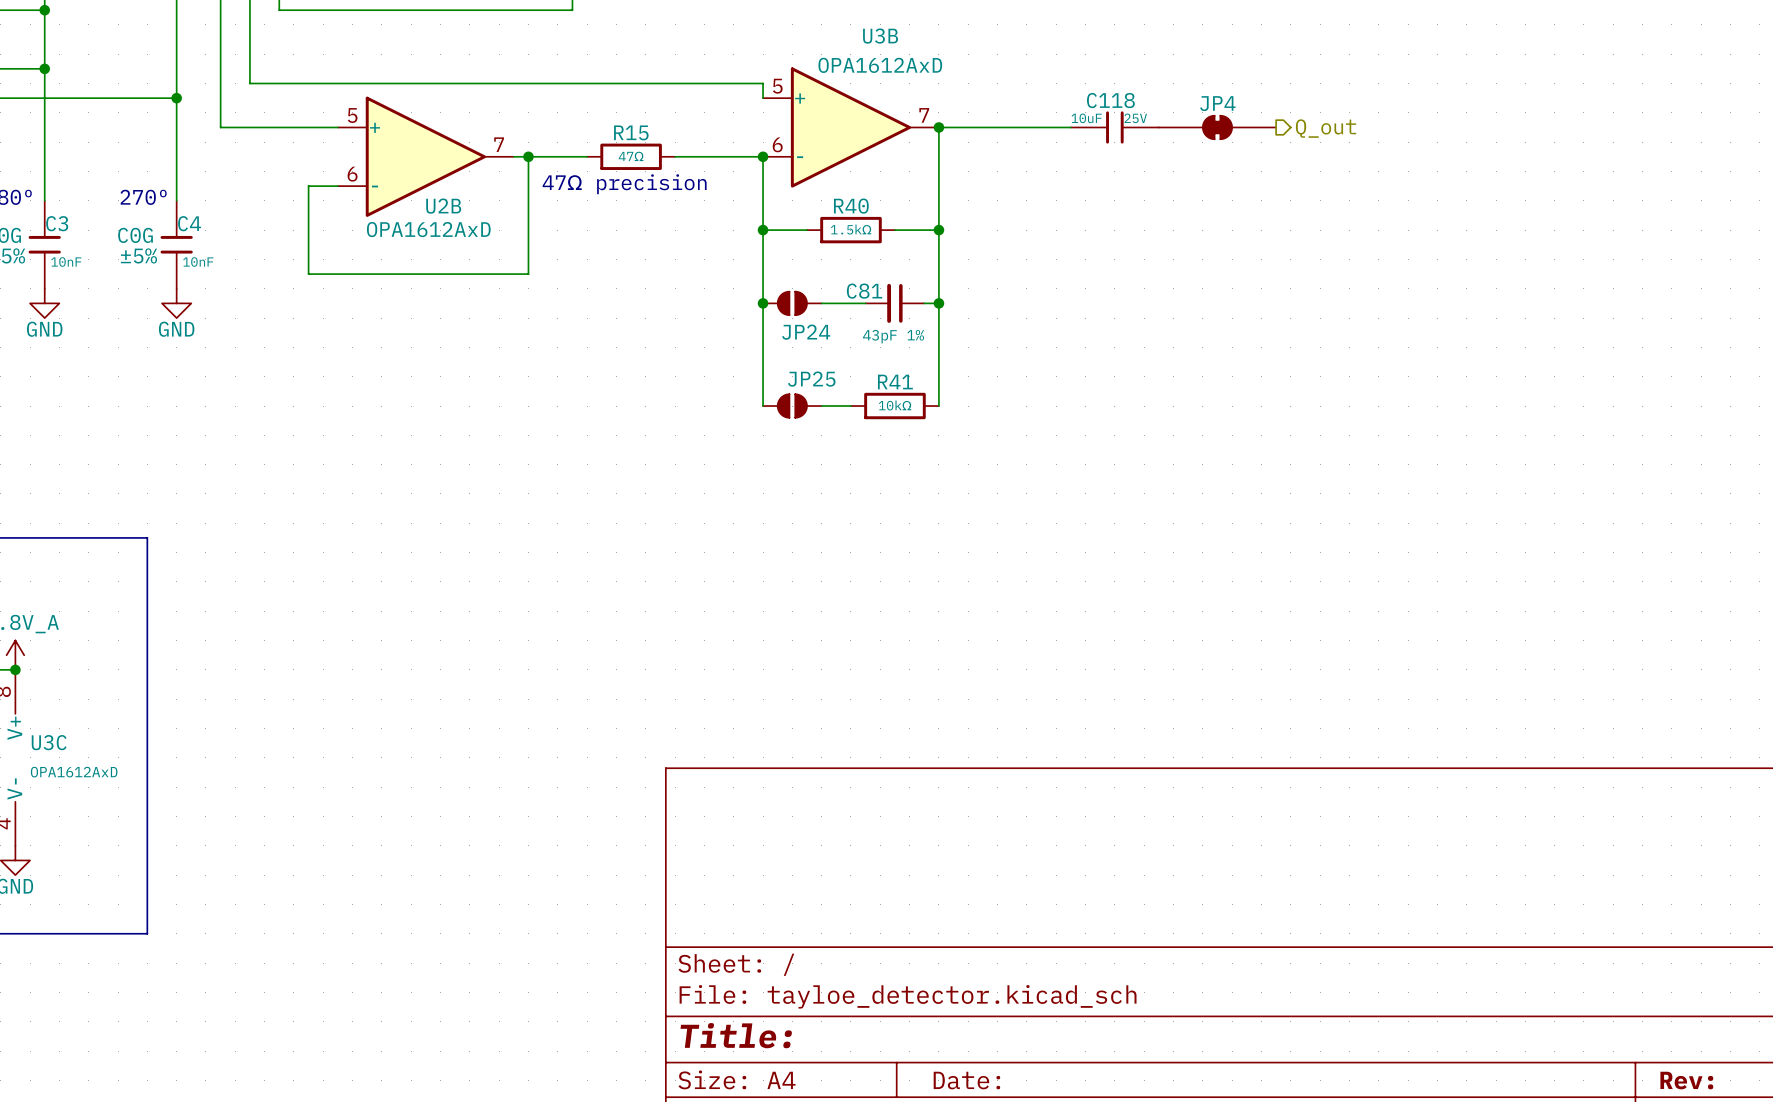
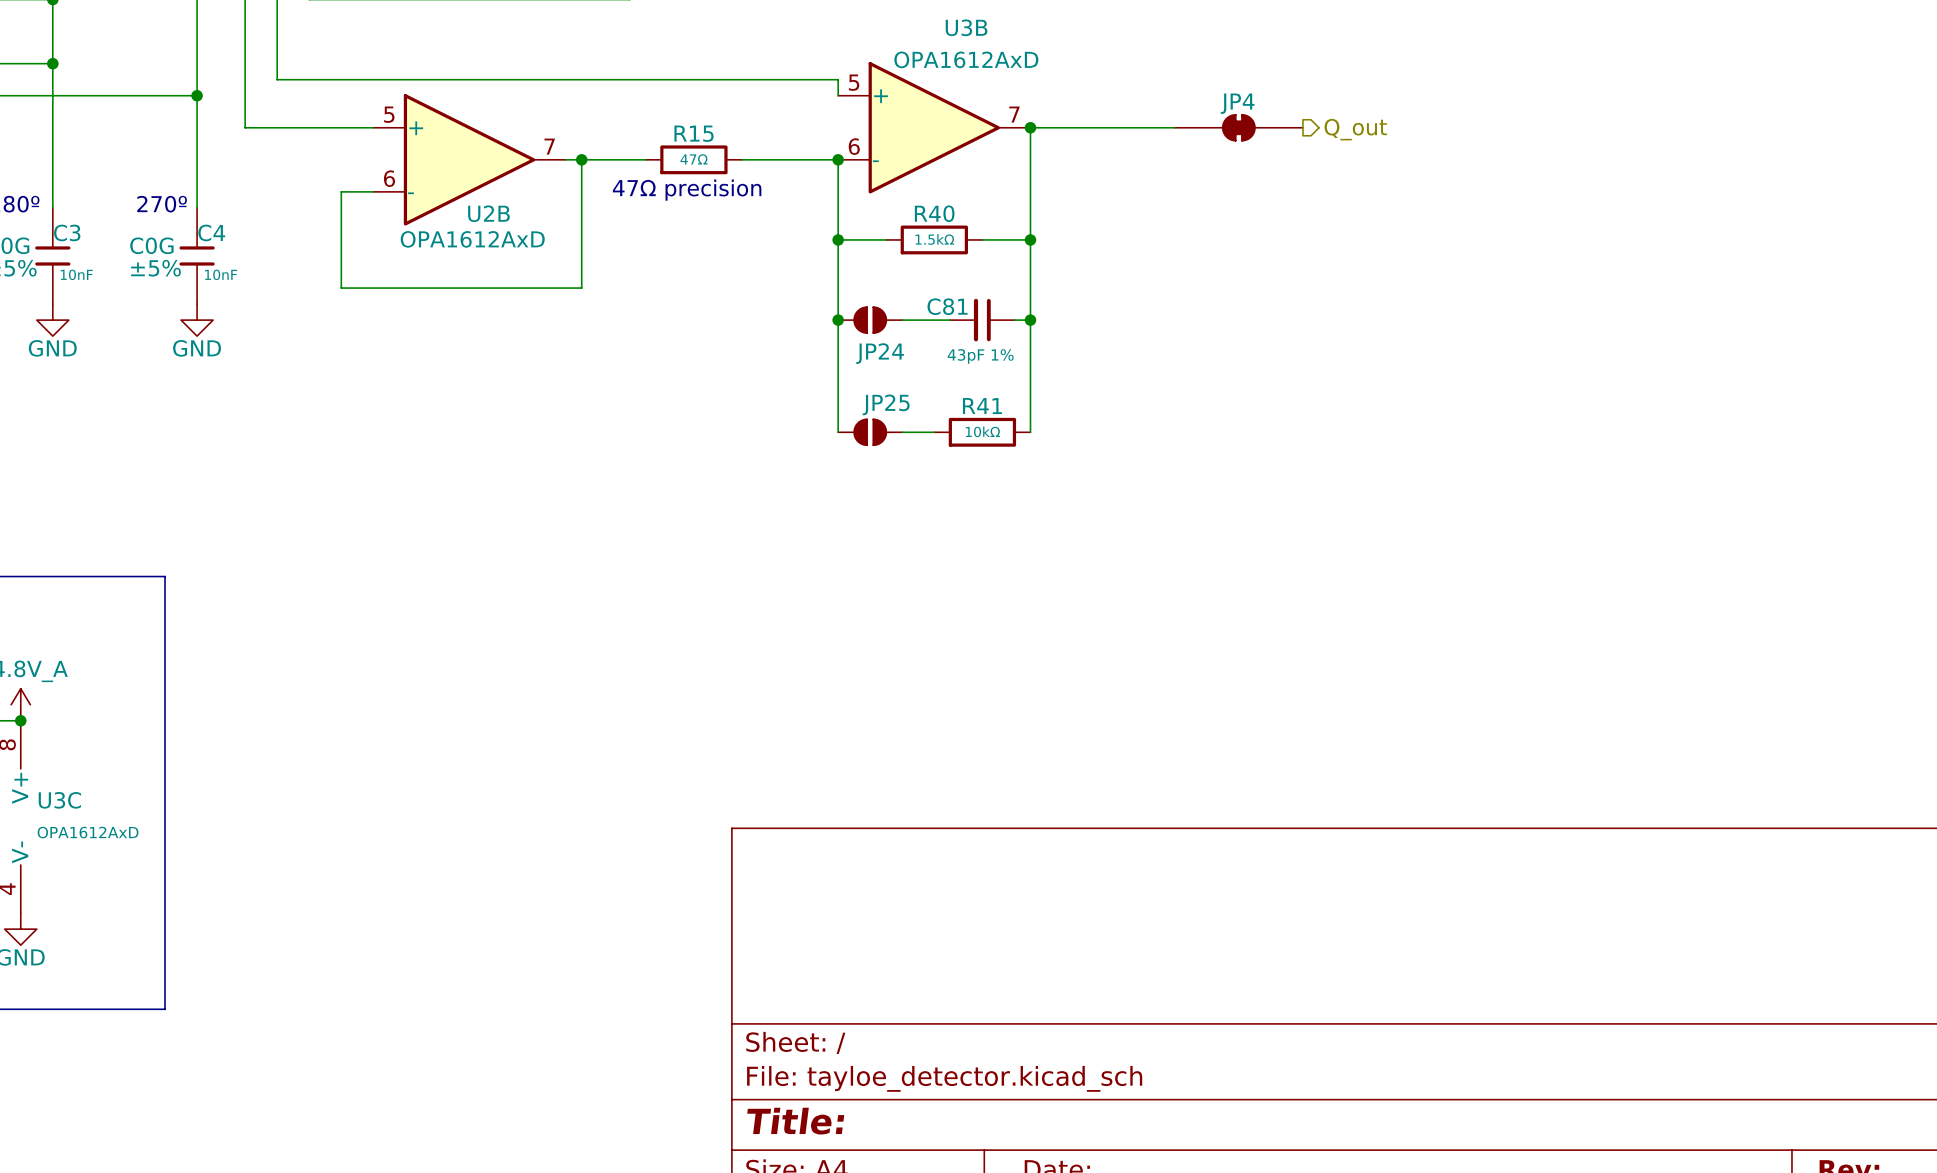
C118: 10uF (1114, 127) -> none
JP4 position: (1217, 127) -> (1238, 127)
hierarchical label position: Q_out (1326, 128) -> Q_out (1355, 129)

